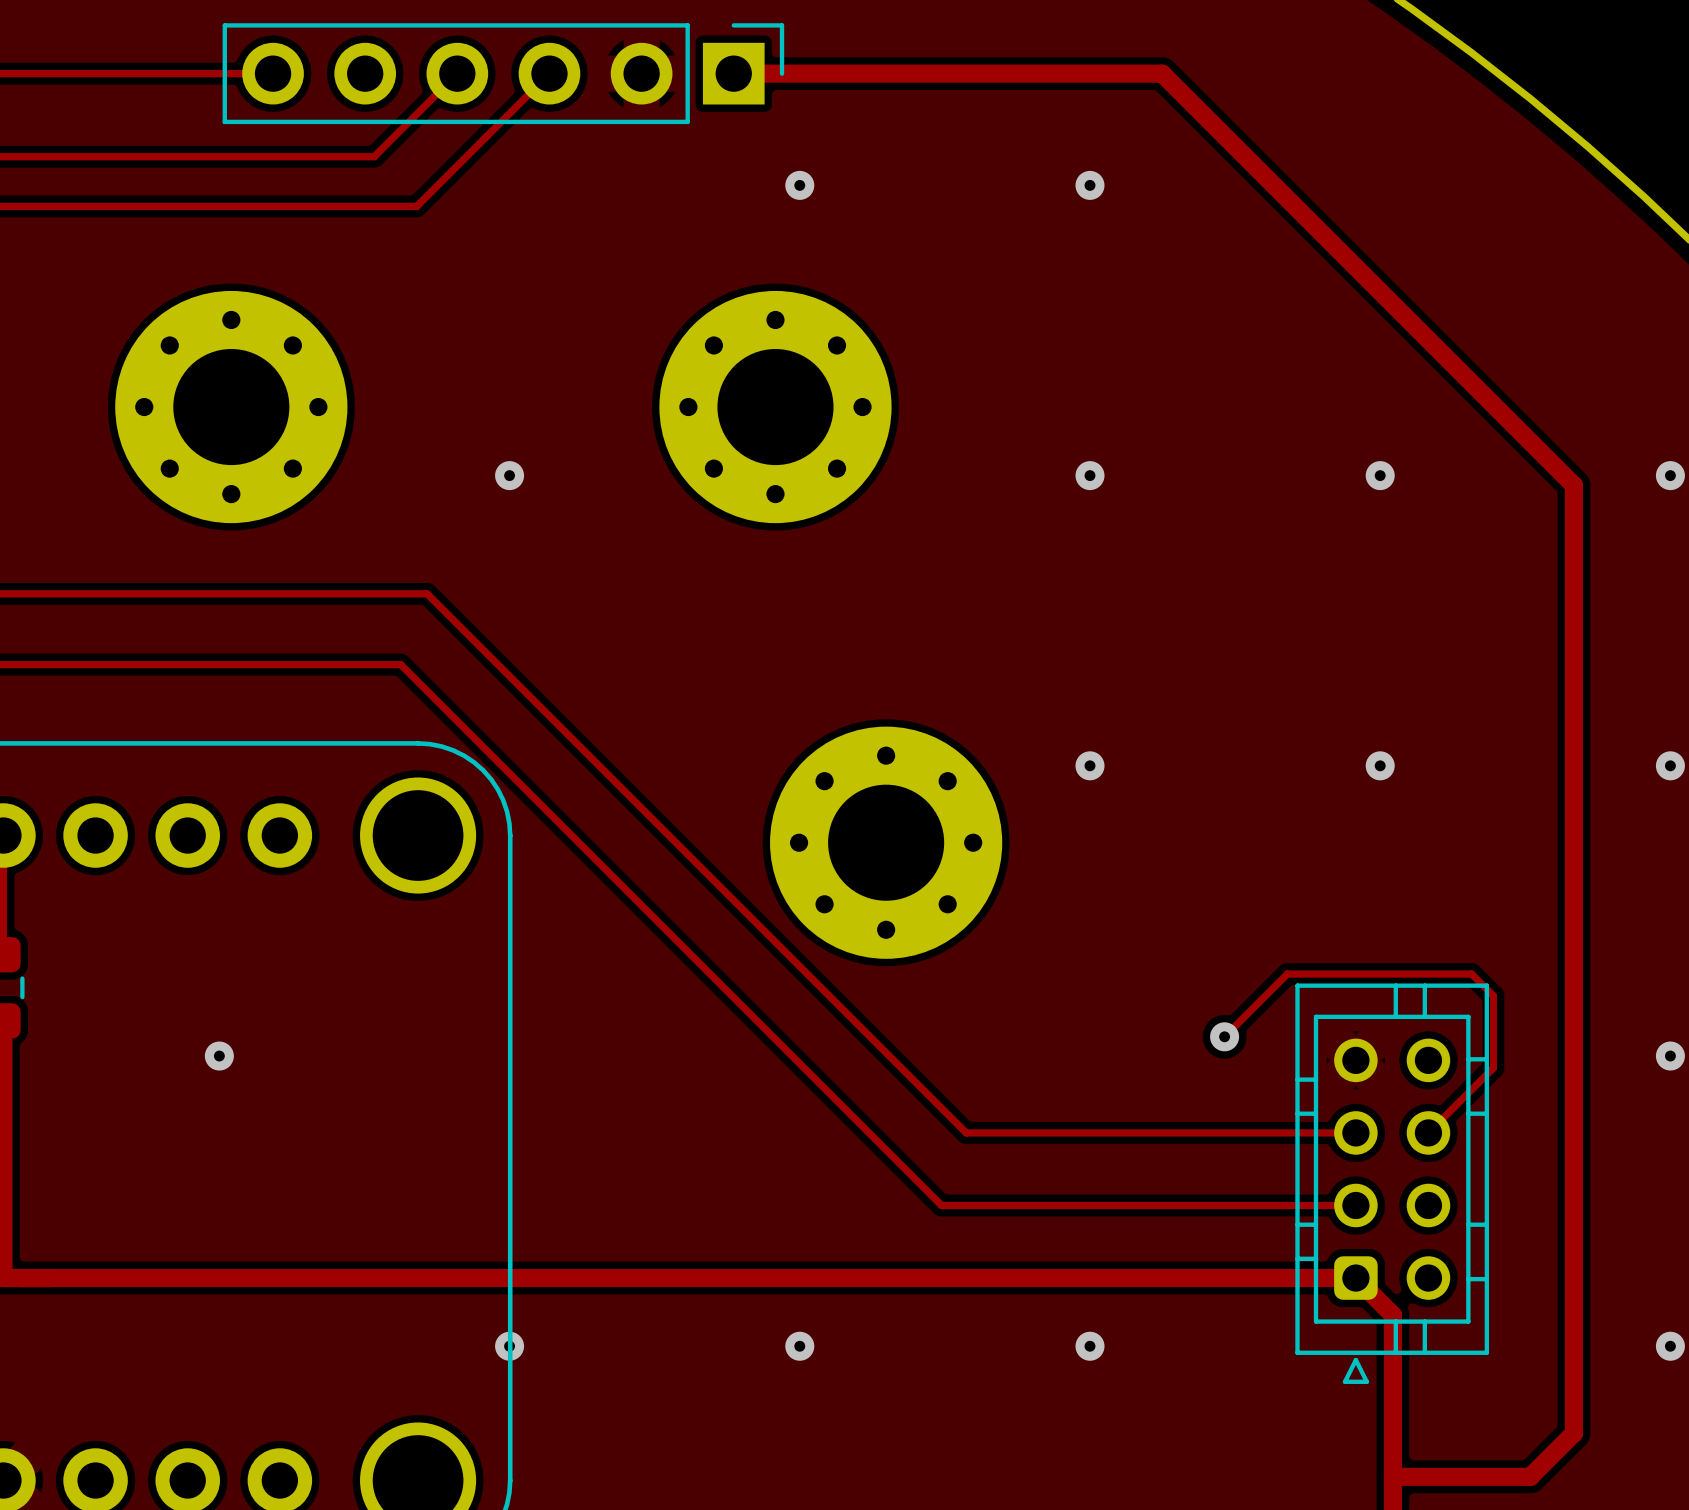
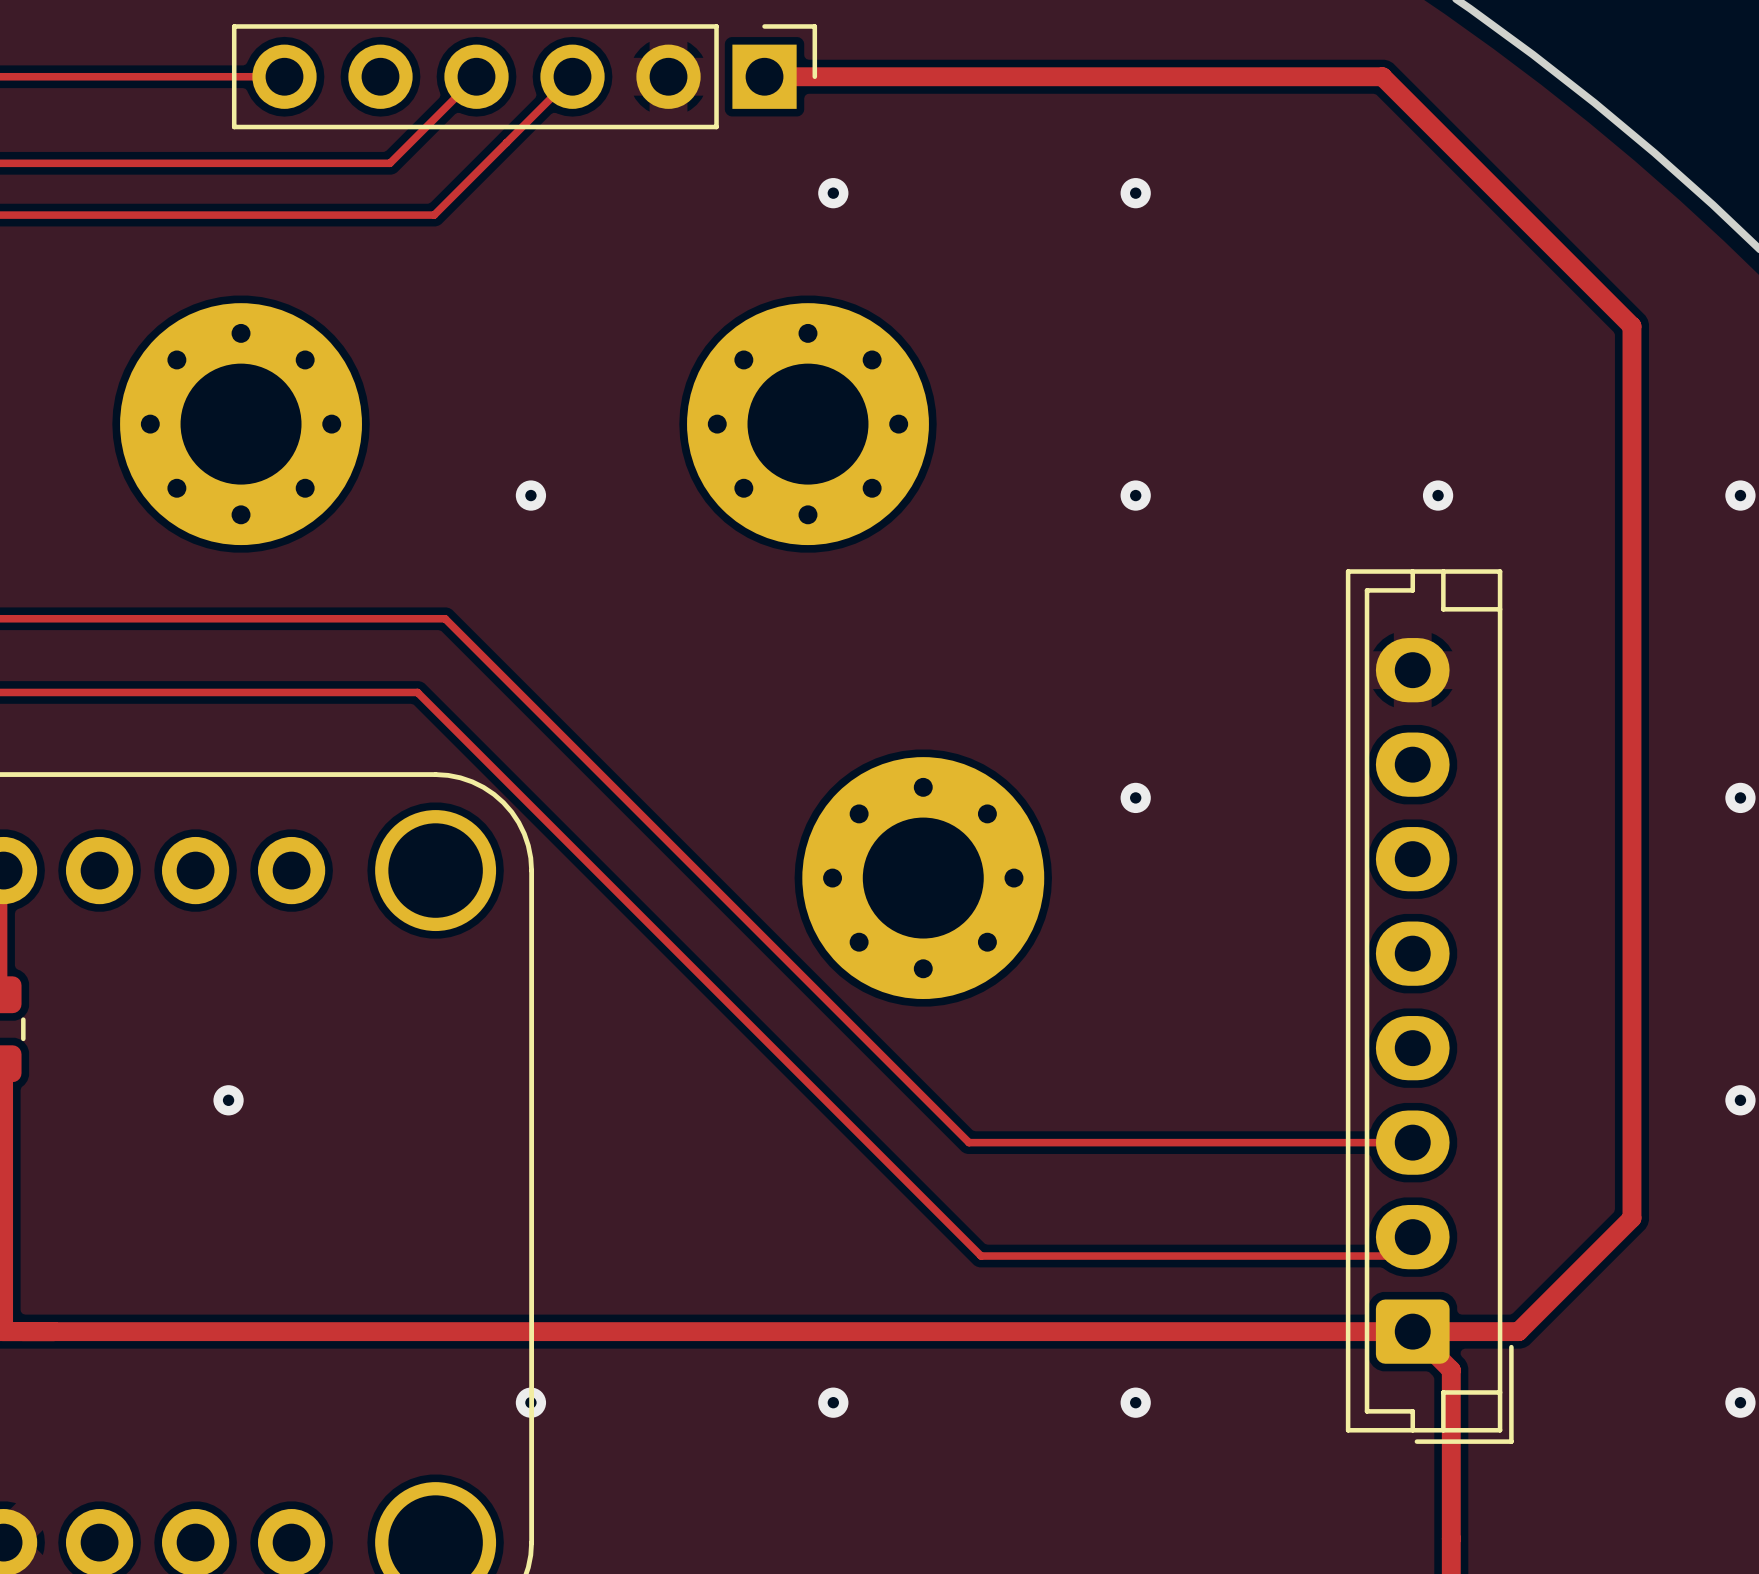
track: (1162, 73) (1573, 485) (1573, 1433) (1530, 1476) (1392, 1476) -> (1210, 76) (1382, 76) (1631, 326) (1631, 1218) (1518, 1331) (1412, 1331)
via: (1380, 765) -> none
part: none -> (1429, 1006)
track: (1224, 1036) (1287, 974) (1471, 974) (1493, 995) (1493, 1068) (1428, 1132) -> none
via: (1224, 1036) -> none
track: (930, 1096) (966, 1132) (1355, 1132) -> (969, 1142) (1412, 1142)
part: (1392, 1183) -> none

